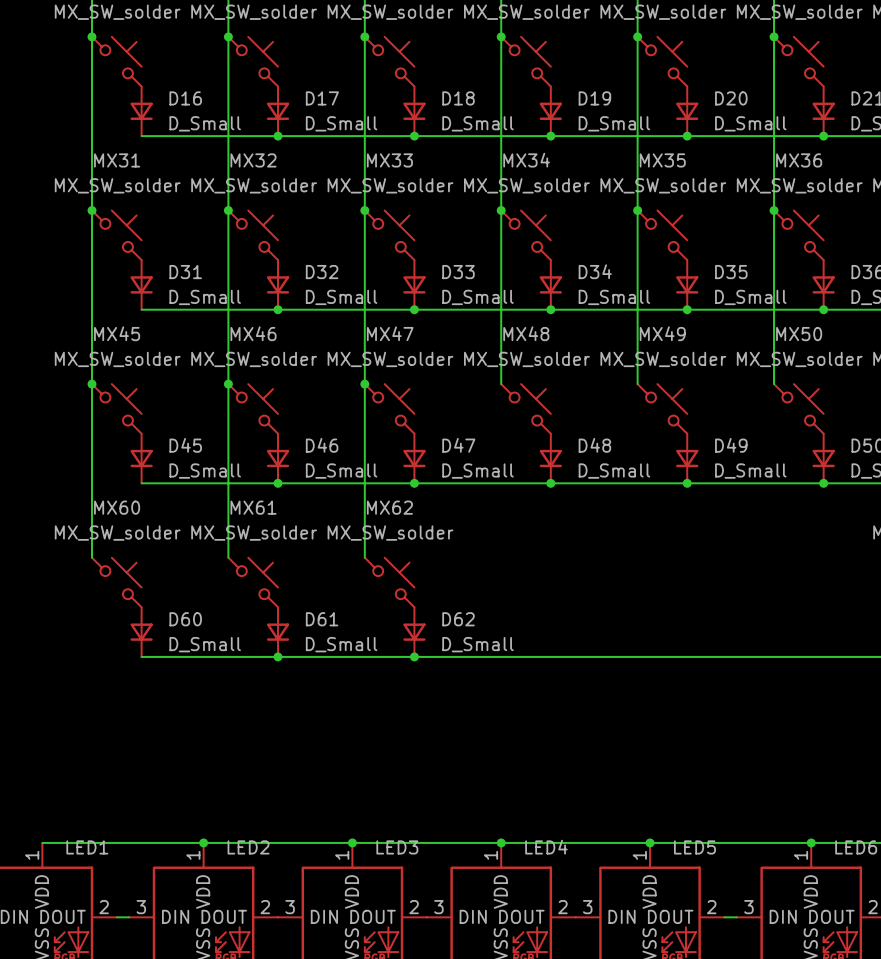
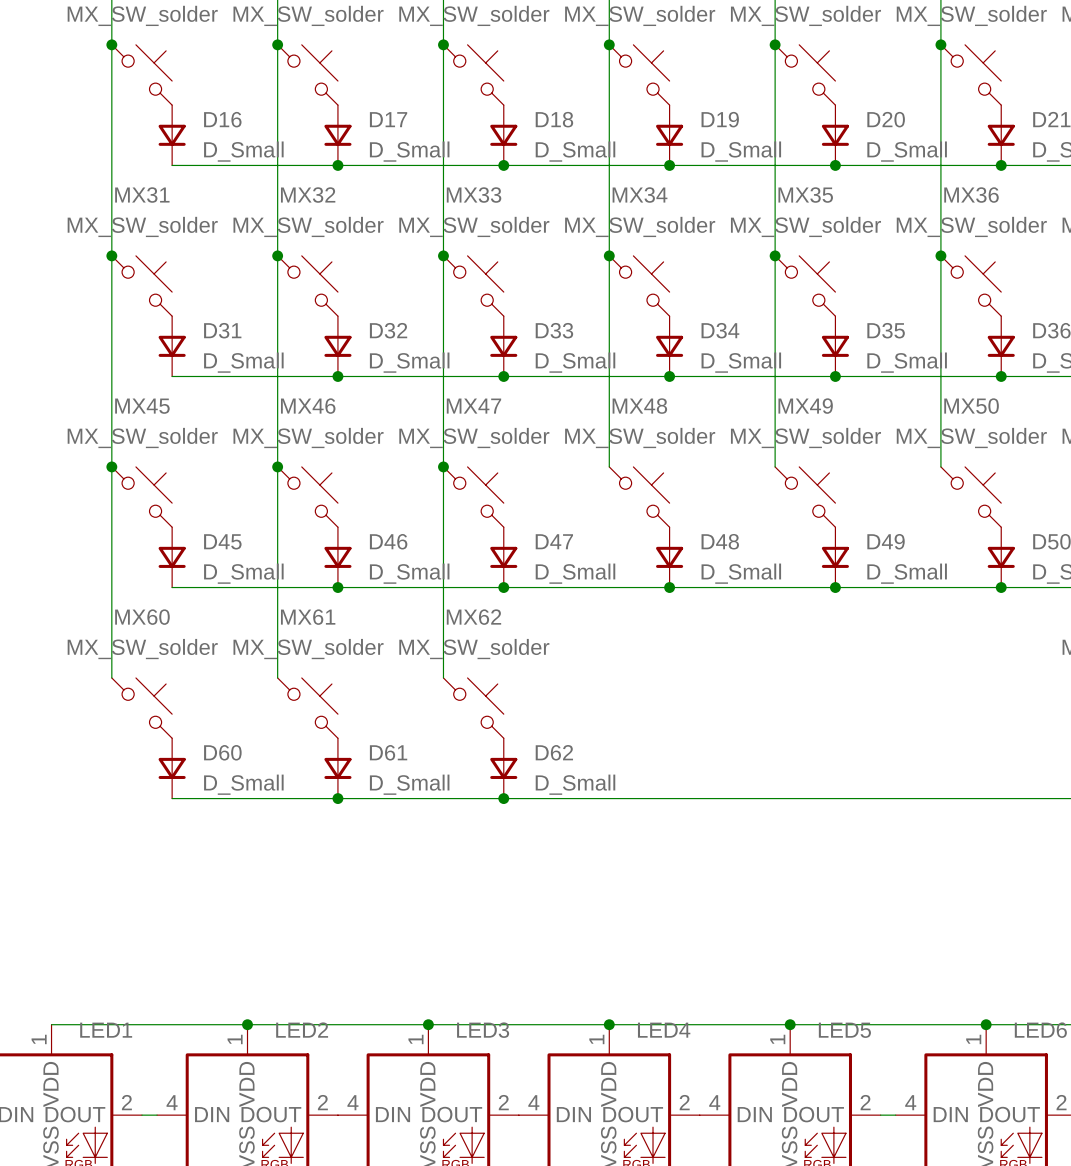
LED2 pin number: 3 (141, 907) -> 4 (172, 1102)
LED3 pin number: 3 (290, 907) -> 4 (352, 1102)
LED4 pin number: 3 (438, 907) -> 4 (533, 1102)
LED5 pin number: 3 (587, 907) -> 4 (714, 1102)
LED6 pin number: 3 (748, 907) -> 4 (910, 1102)

